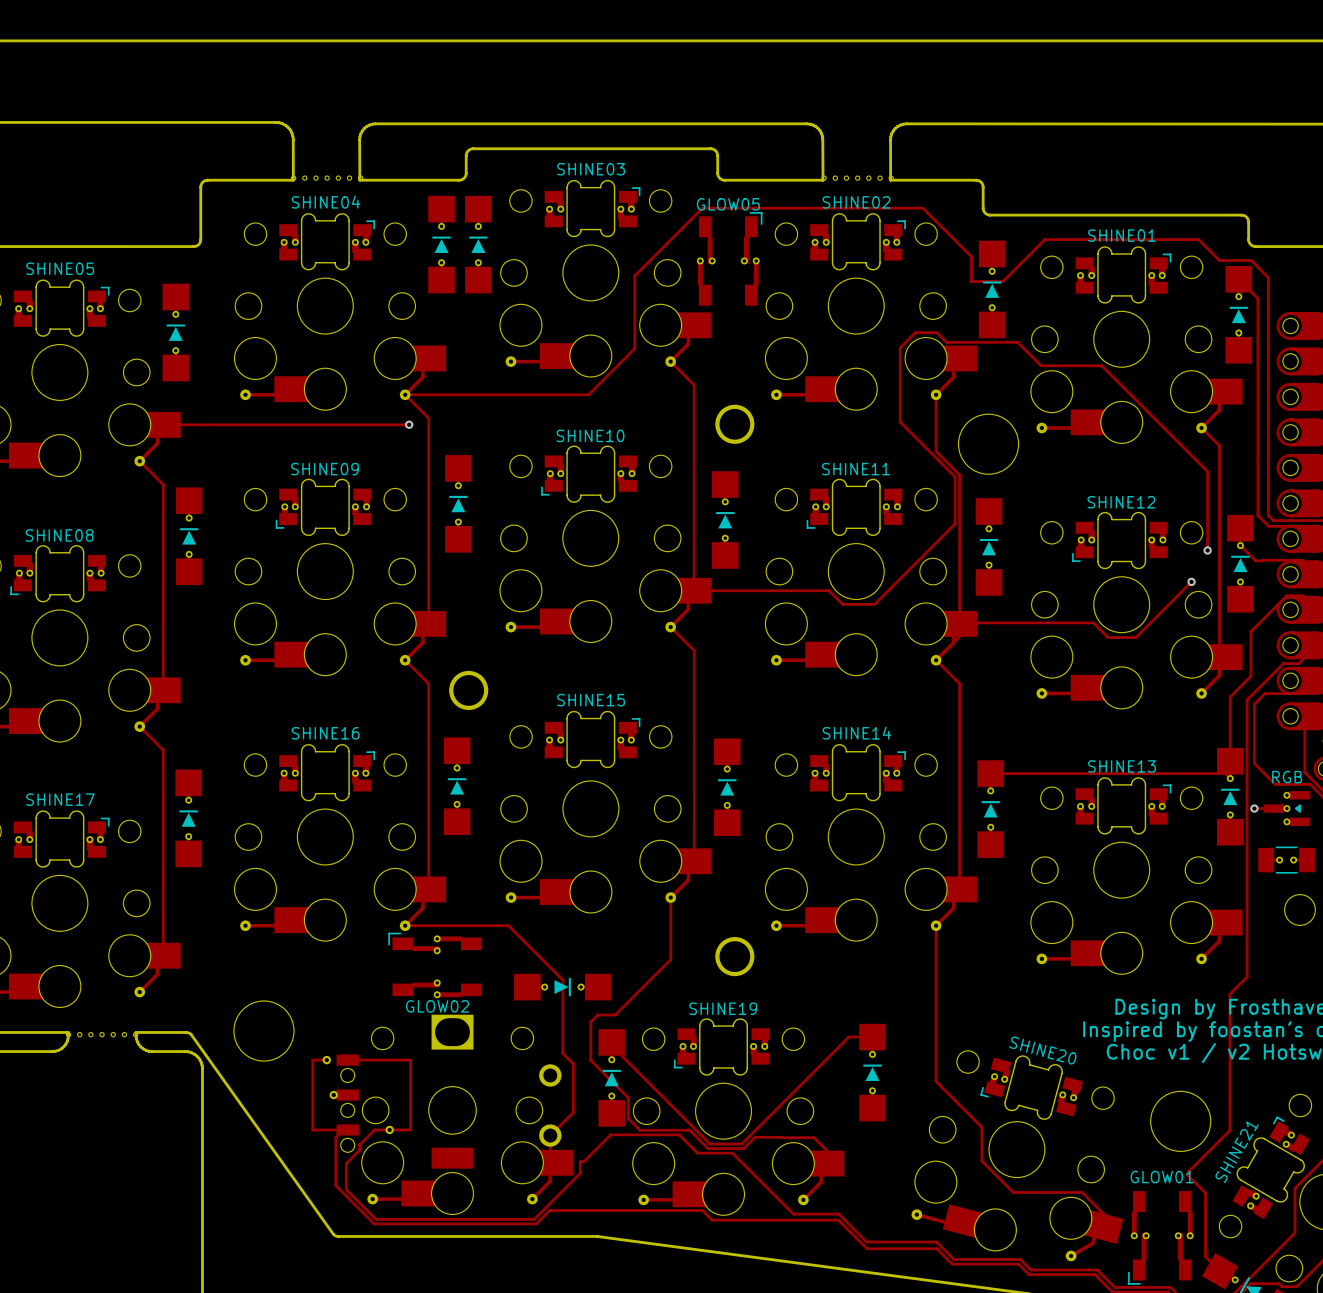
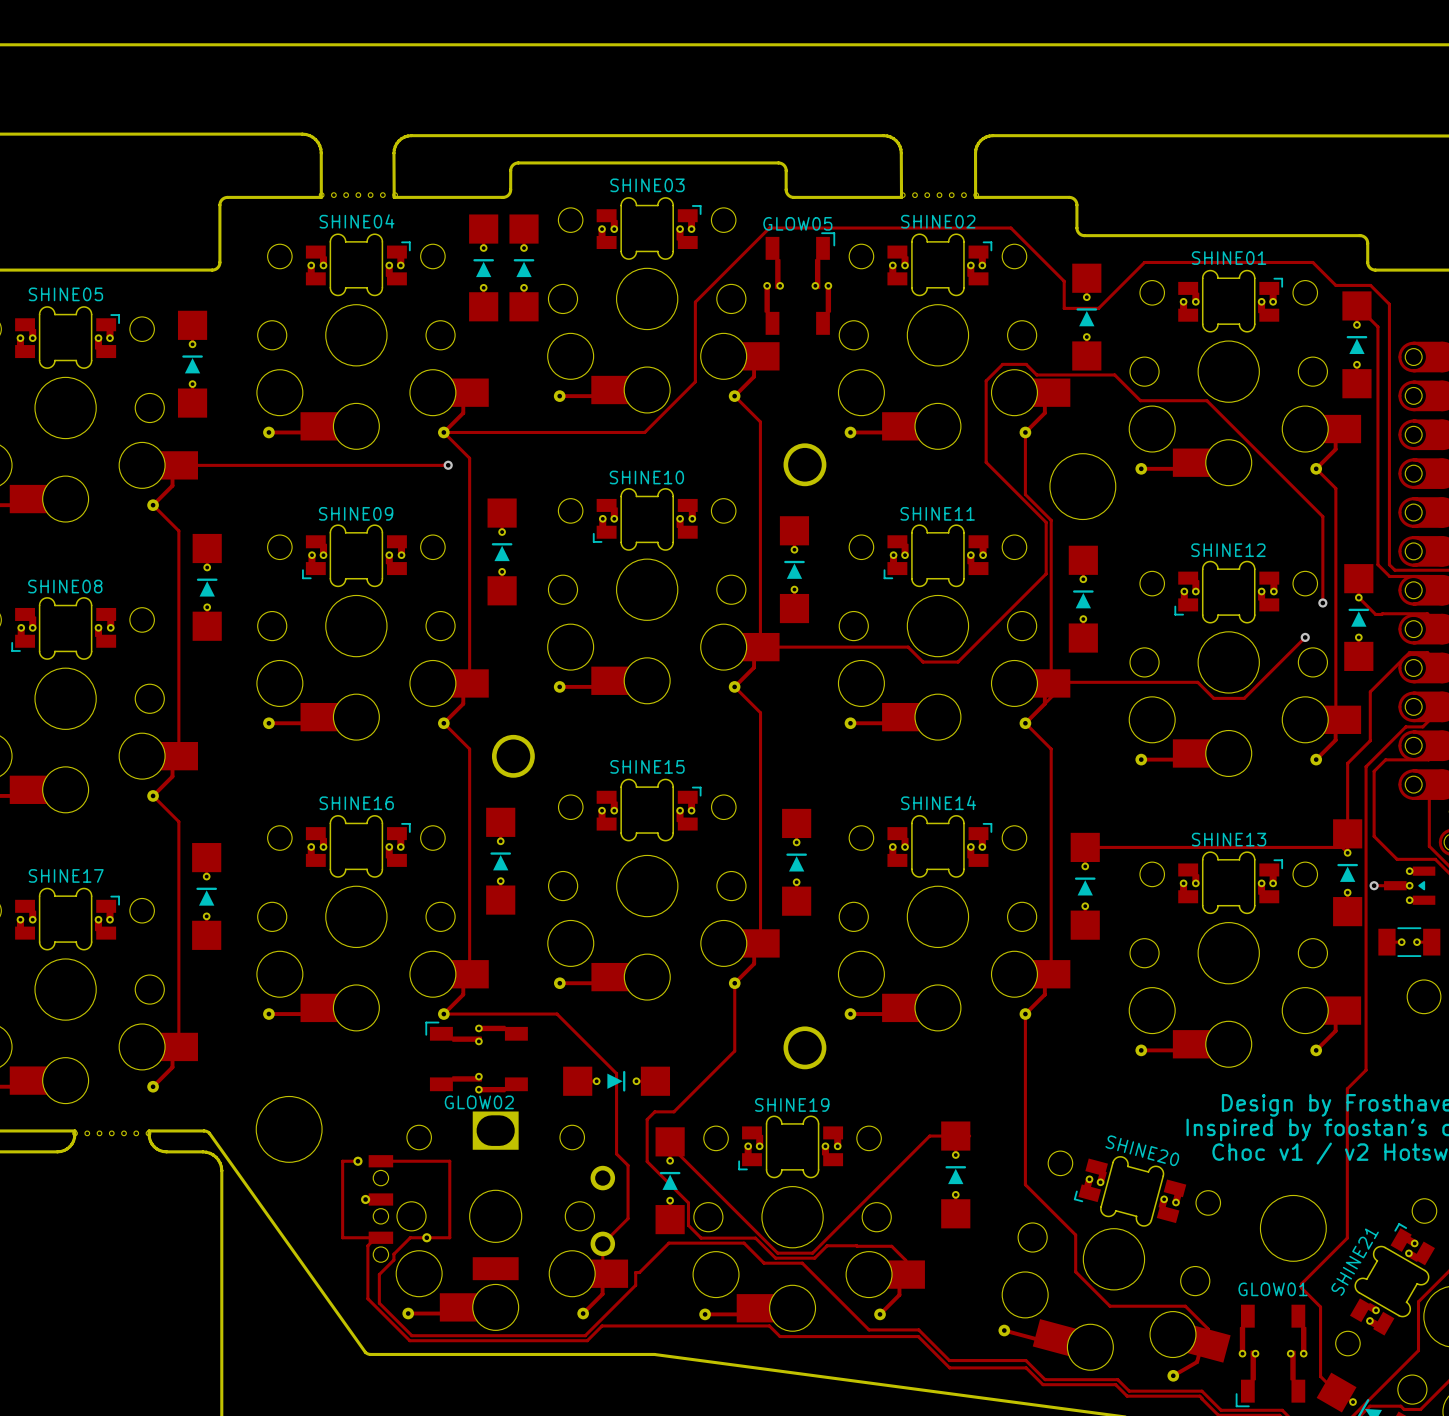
part text: RGB (1287, 777) -> none

